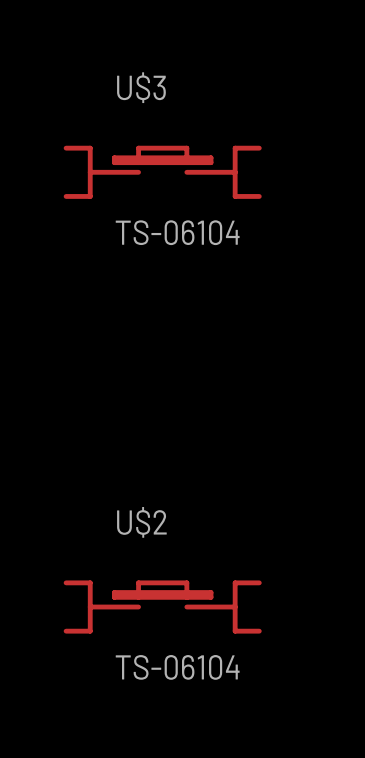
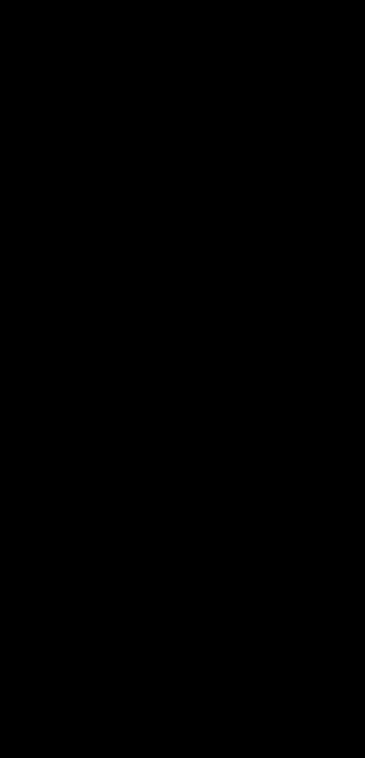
U$3: TS-06104 (162, 172) -> none
U$2: TS-06104 (162, 607) -> none

